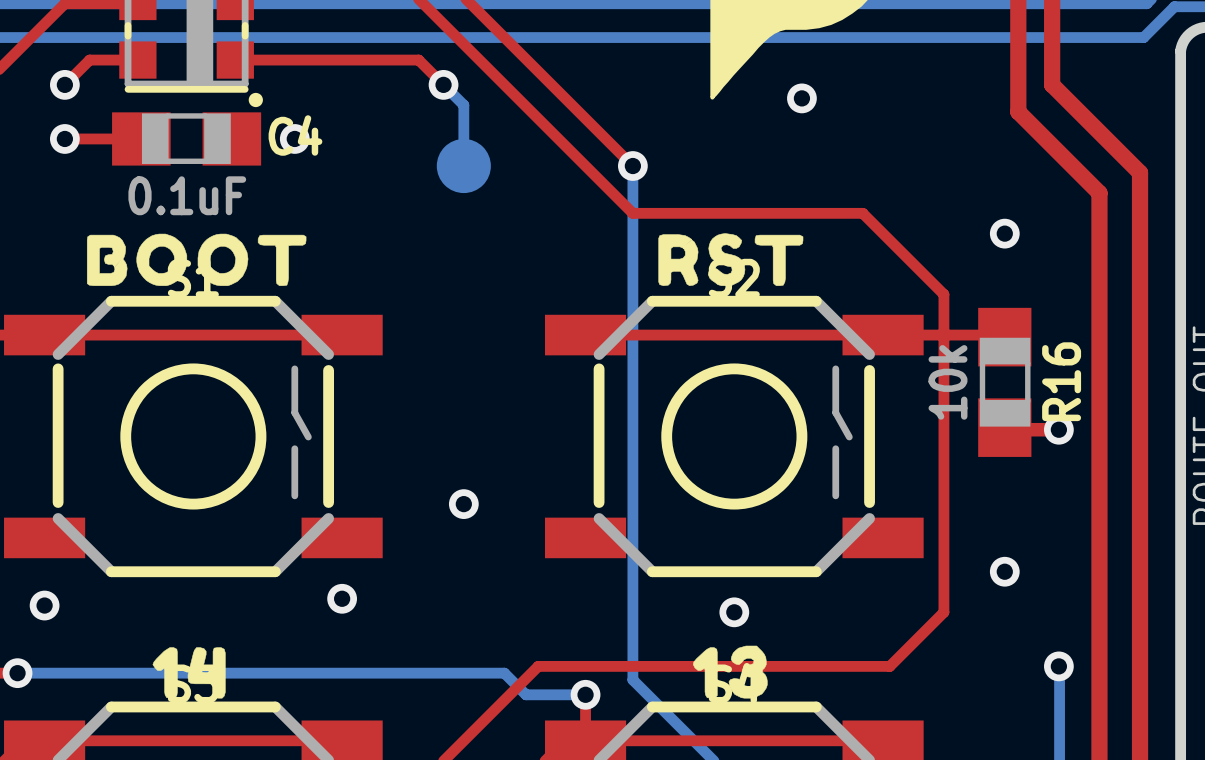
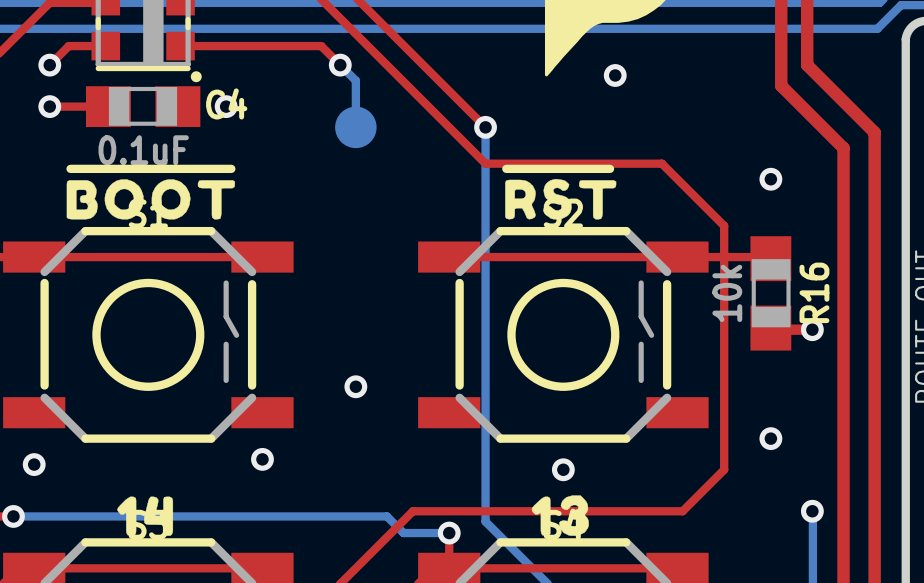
line: none -> (70, 168) (231, 168)
line: none -> (506, 168) (610, 168)

